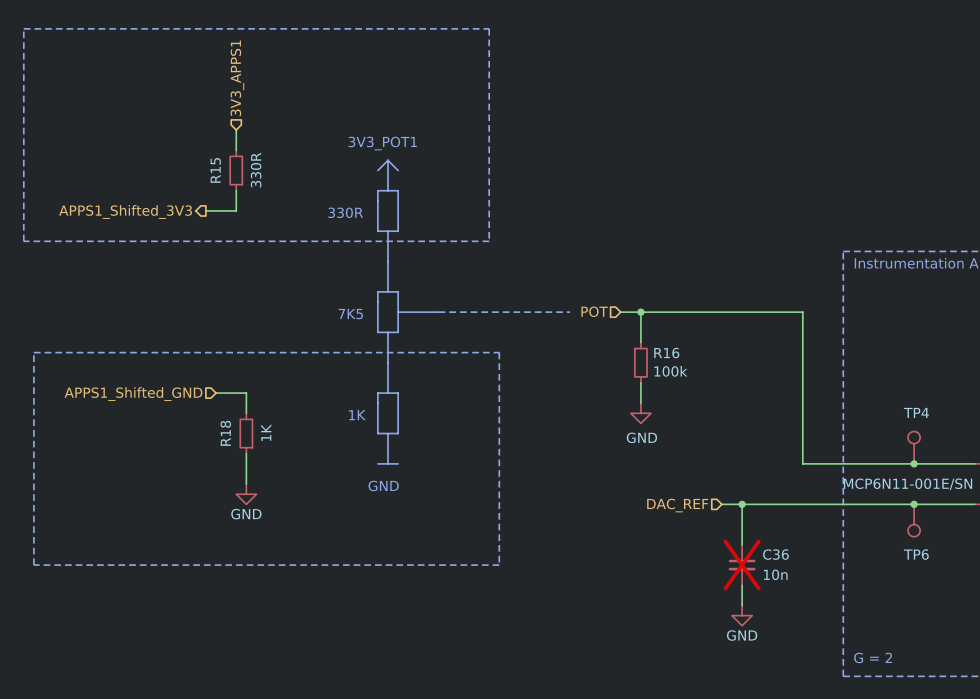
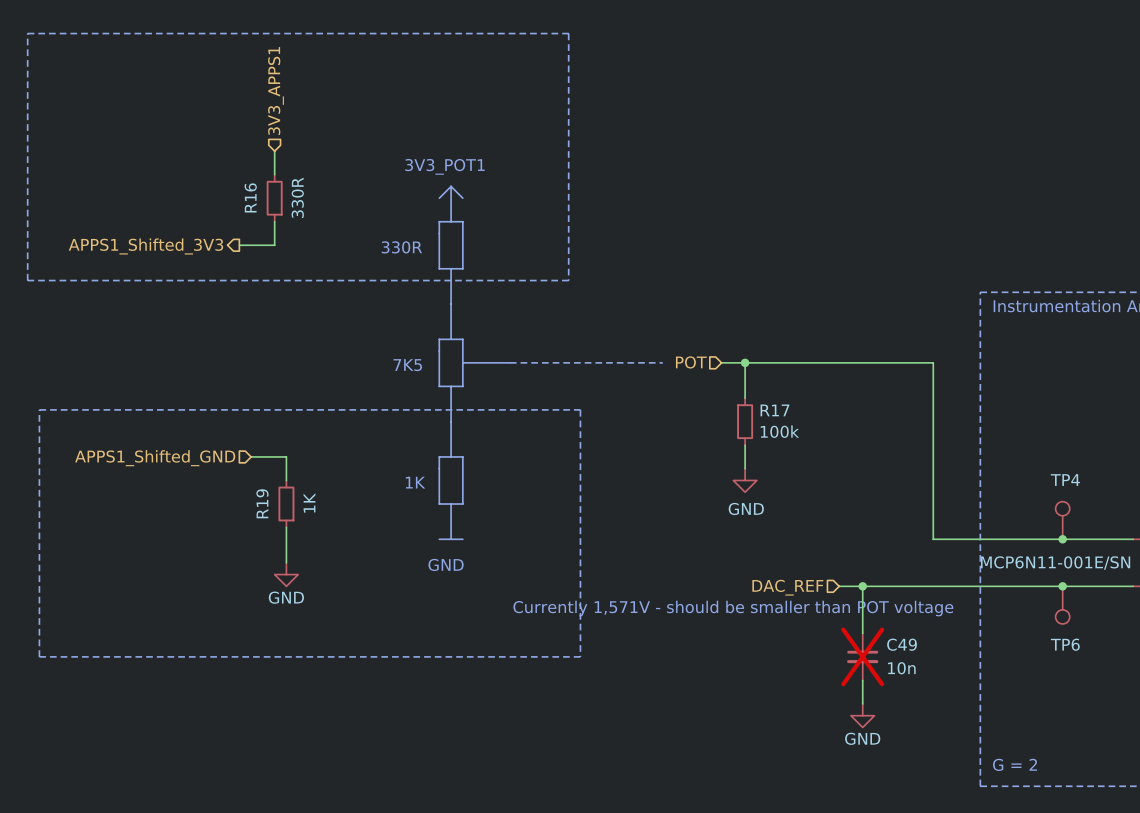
R15 name: R15 (215, 170) -> R16 (250, 197)
R16 name: R16 (666, 353) -> R17 (774, 410)
R18 name: R18 (225, 433) -> R19 (262, 503)
text: none -> Currently 1,571V - should be smaller than POT voltage (733, 608)
C36 name: C36 (775, 554) -> C49 (902, 644)

